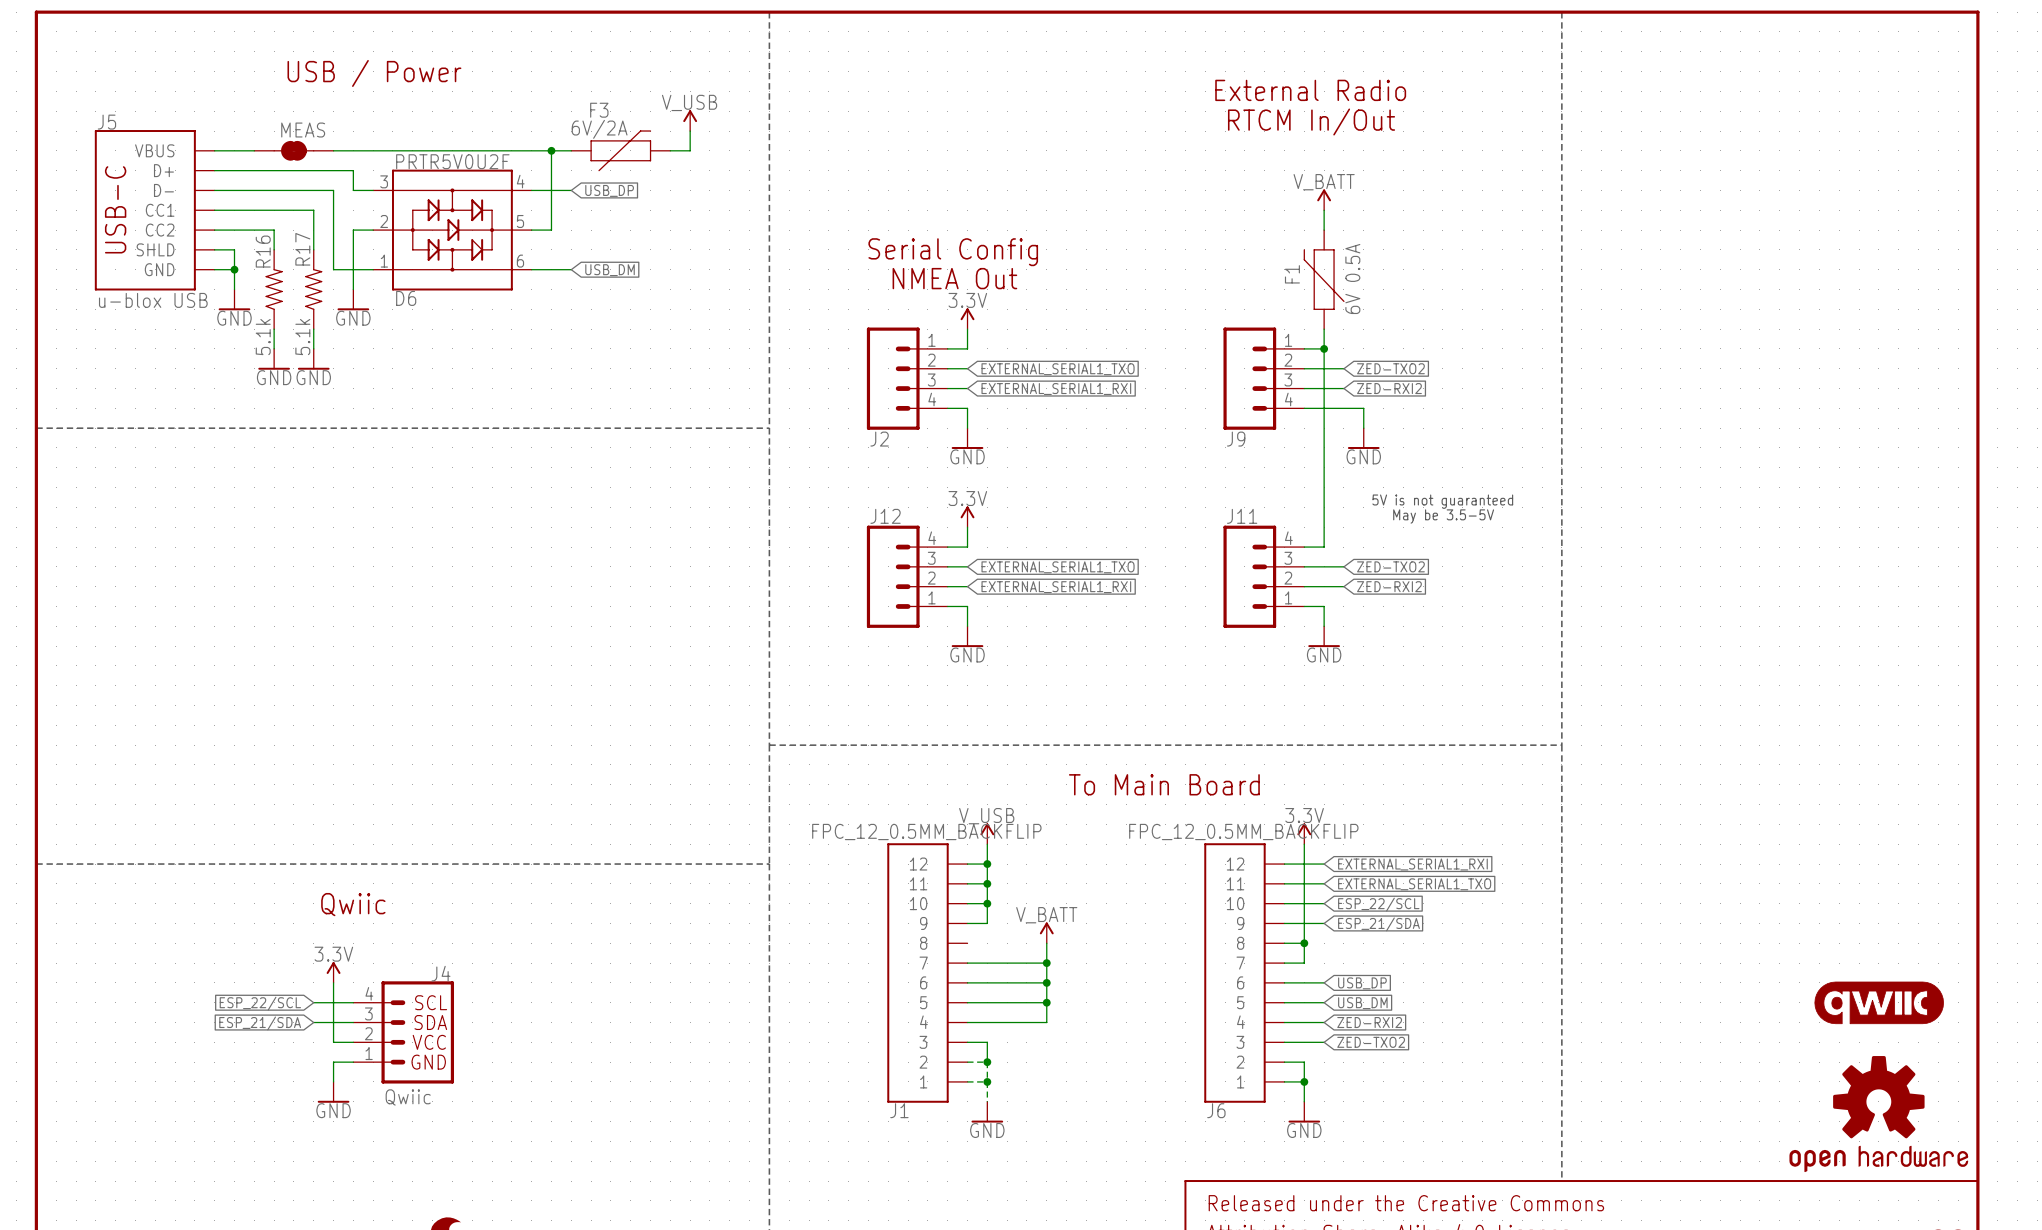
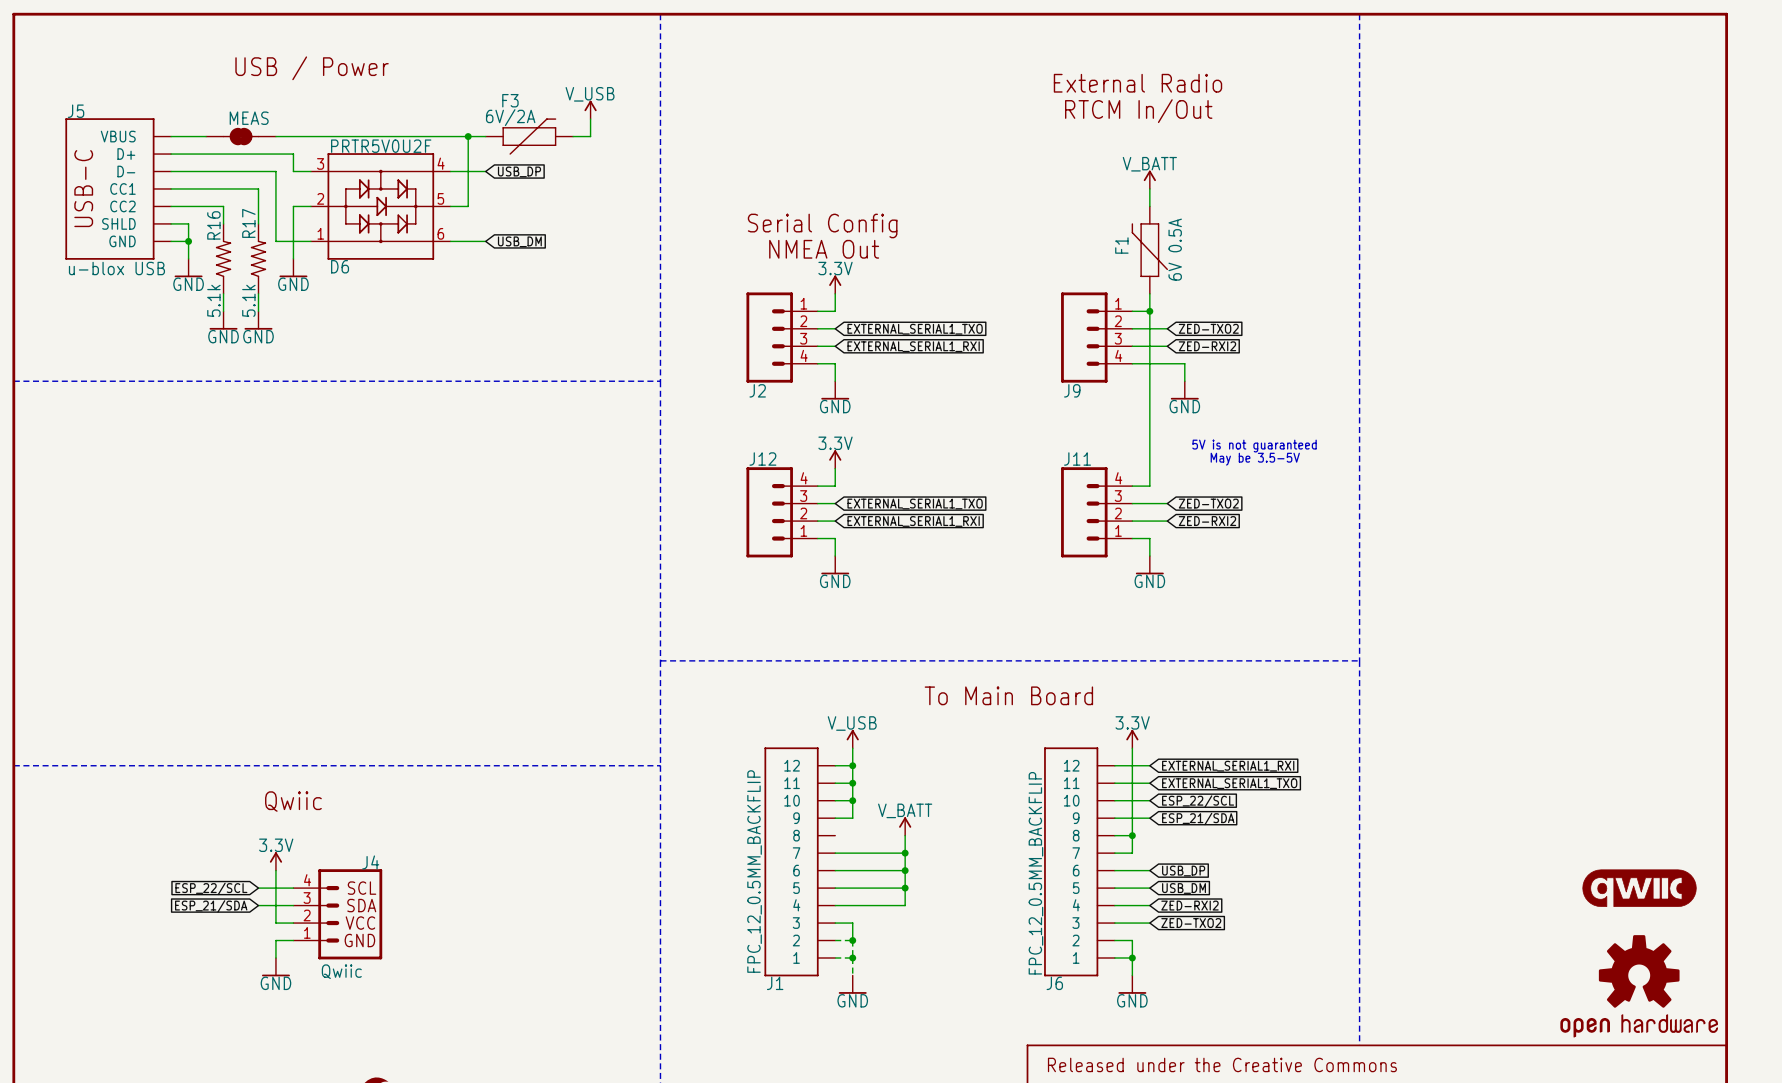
J1 value rotation: 0° (926, 832) -> 90° counterclockwise (754, 871)
J6 value rotation: 0° (1243, 832) -> 90° counterclockwise (1035, 873)

